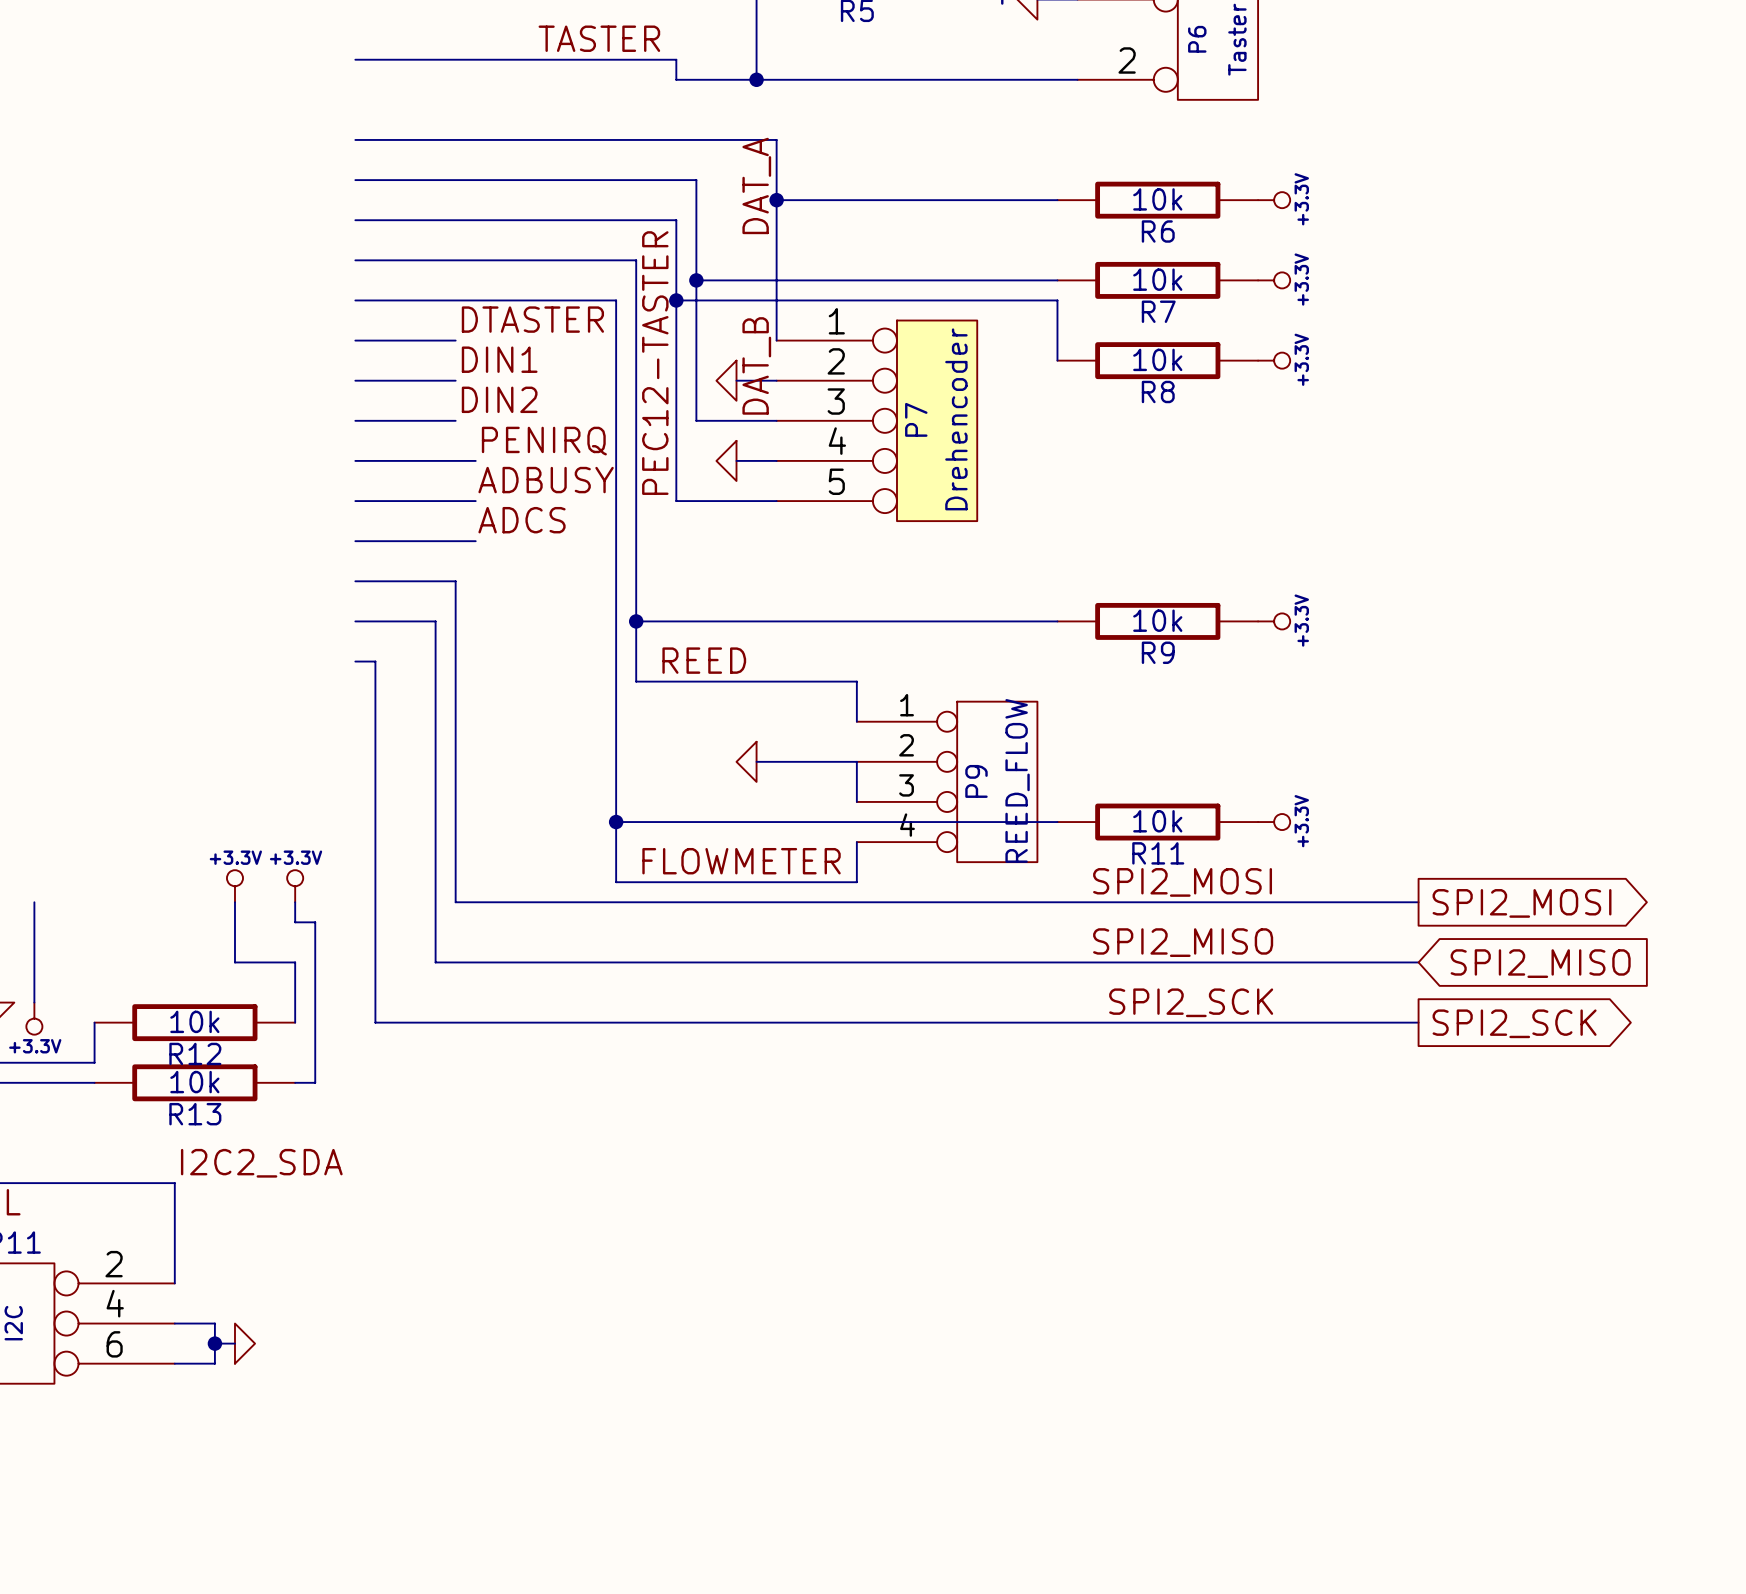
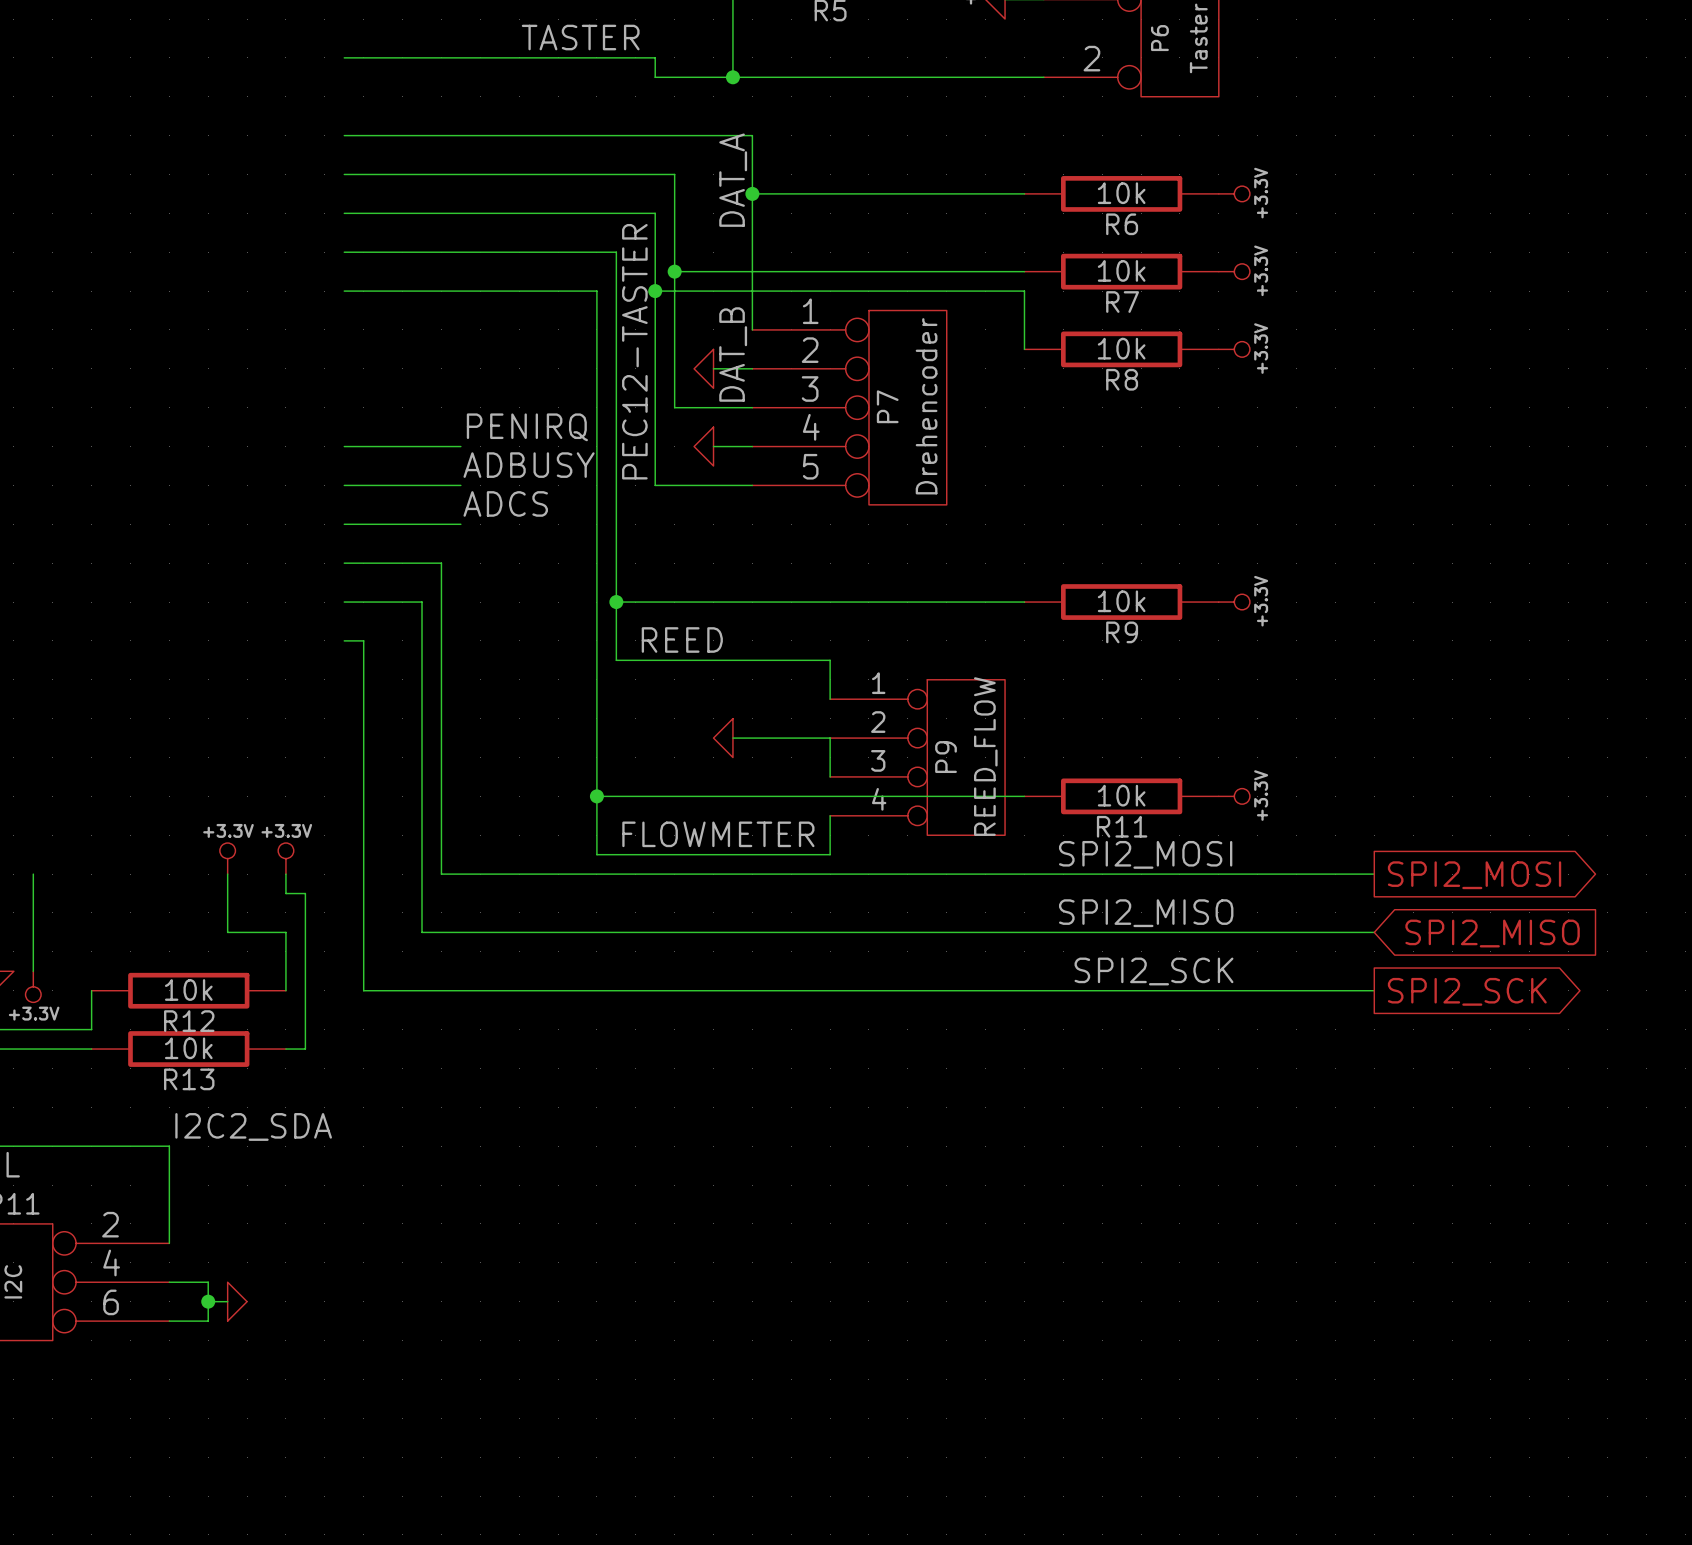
label: DTASTER (532, 319) -> none
wire: (355, 340) (455, 340) -> none
label: DIN1 (499, 359) -> none
wire: (355, 380) (455, 380) -> none
label: DIN2 (499, 399) -> none
wire: (355, 420) (455, 420) -> none

